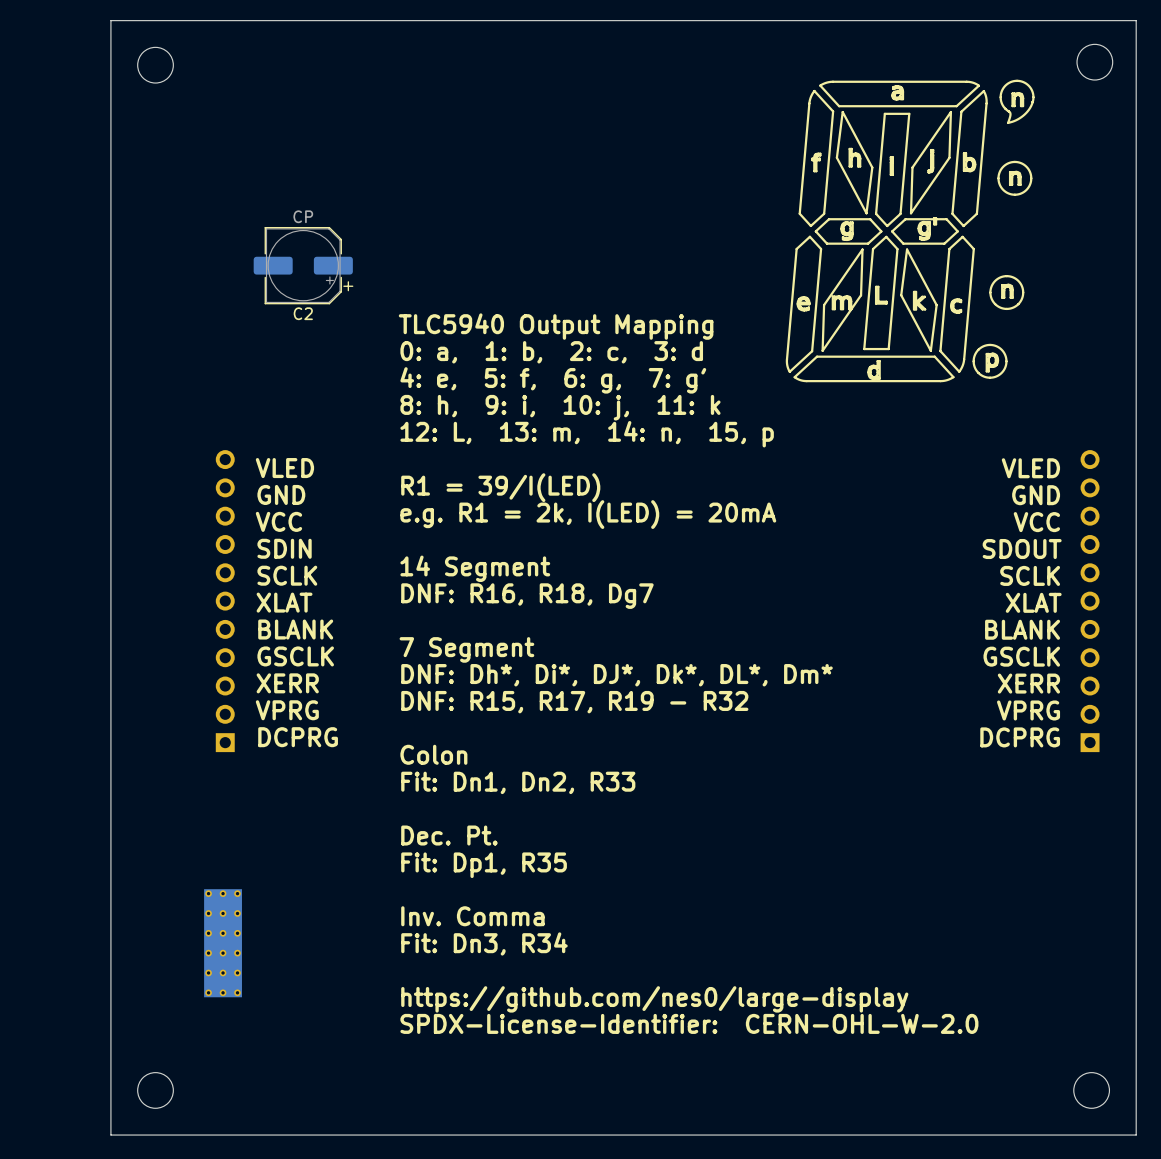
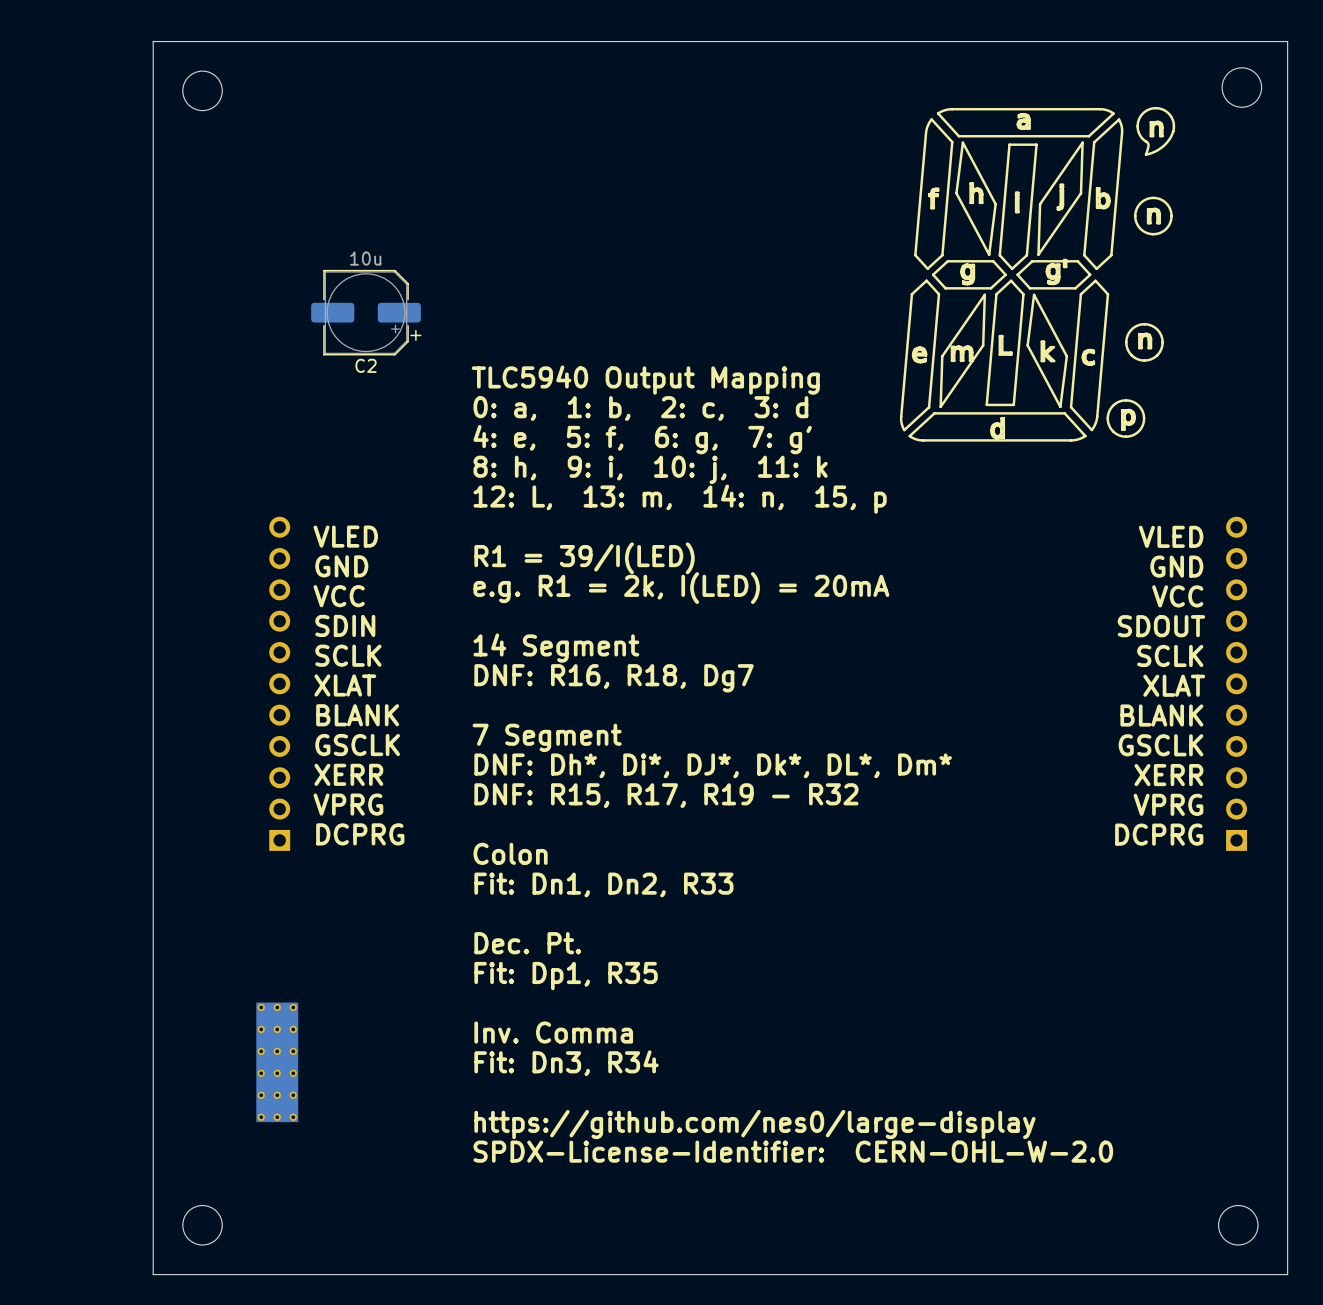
C2 value: CP (303, 216) -> 10u (365, 258)

